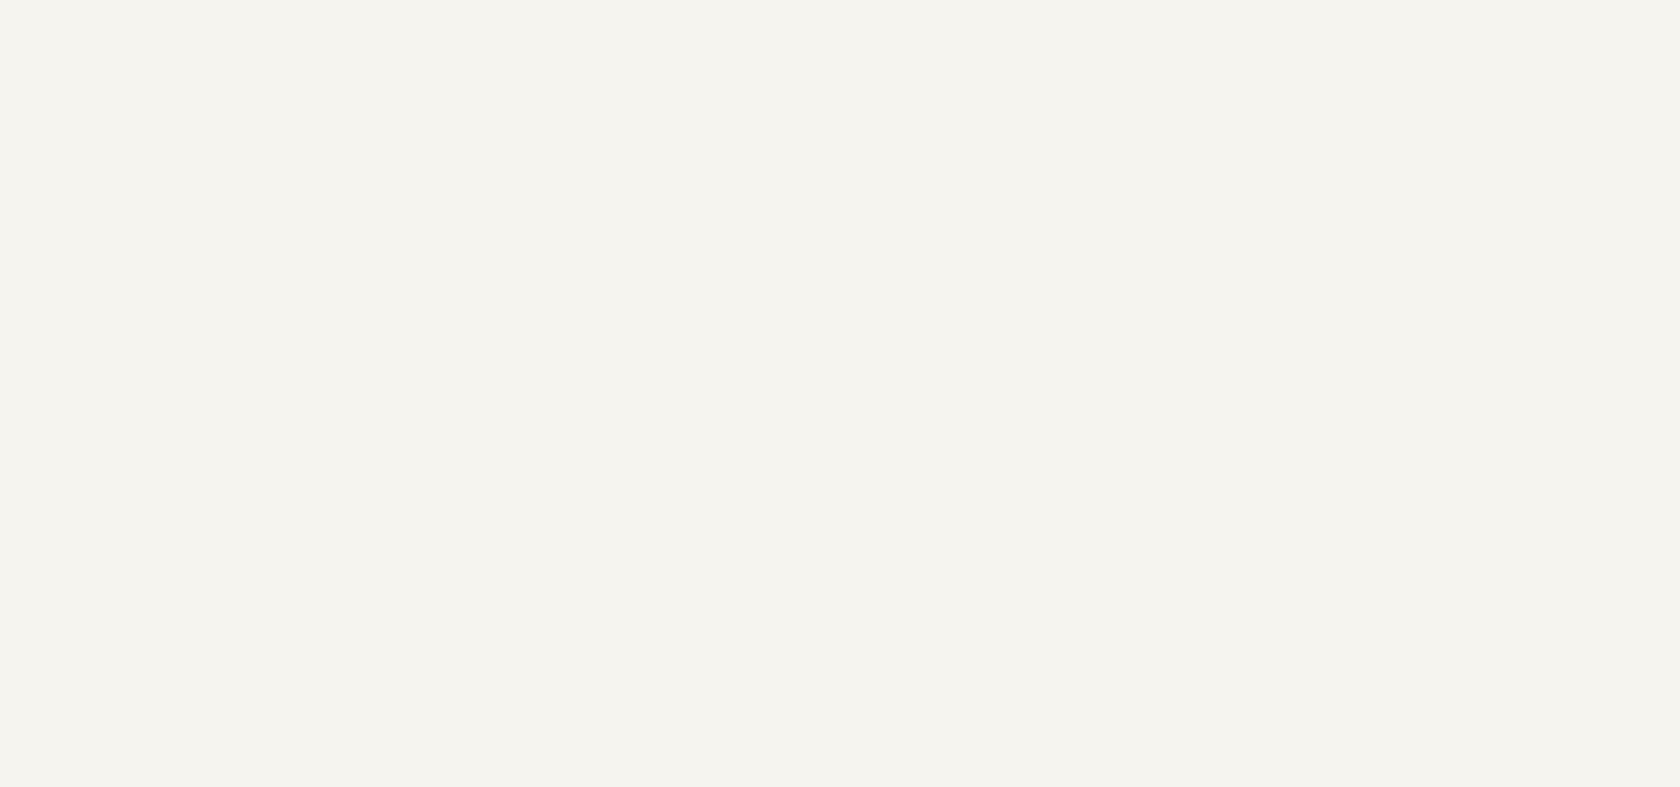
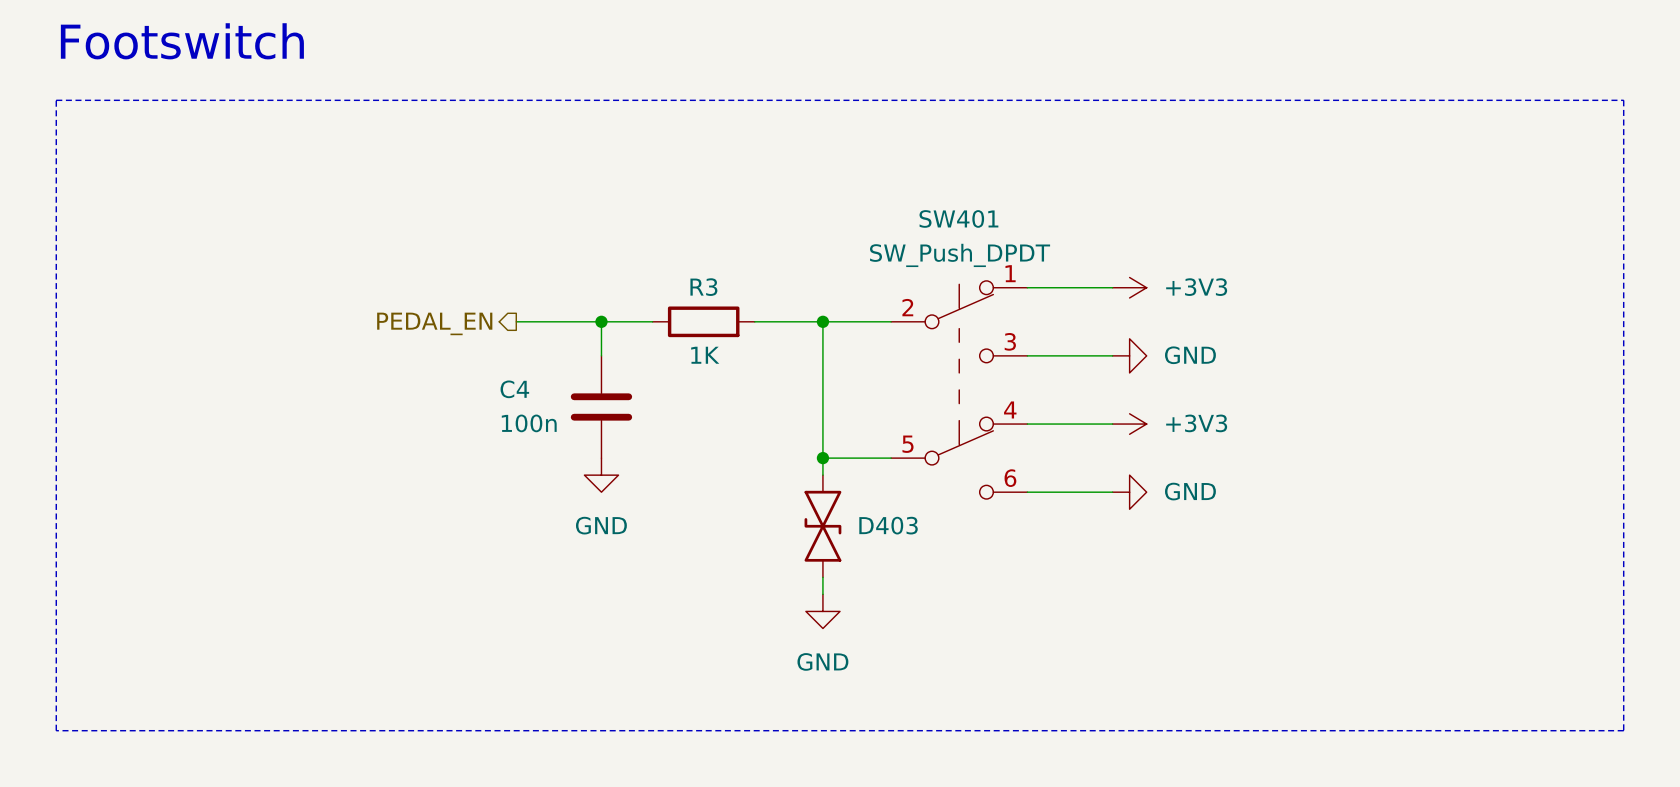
text: none -> Footswitch (182, 41)
line: none -> (56, 100) (1623, 100) (1623, 730) (56, 730) (56, 100)
wire: none -> (1027, 287) (1112, 287)
power symbol: none -> +3V3 (1129, 287)
wire: none -> (516, 321) (652, 321)
wire: none -> (601, 321) (601, 355)
junction: none -> (601, 321)
R3: none -> 1K (703, 321)
wire: none -> (754, 321) (891, 321)
wire: none -> (822, 321) (822, 475)
junction: none -> (822, 321)
hierarchical label: none -> PEDAL_EN (434, 323)
wire: none -> (1027, 355) (1112, 355)
power symbol: none -> GND (1129, 355)
SW401: none -> SW_Push_DPDT (959, 389)
C4: none -> 100n (601, 406)
wire: none -> (1027, 424) (1112, 424)
power symbol: none -> +3V3 (1129, 424)
wire: none -> (822, 458) (891, 458)
junction: none -> (822, 458)
power symbol: none -> GND (601, 475)
wire: none -> (1027, 492) (1112, 492)
power symbol: none -> GND (1129, 492)
D403: none -> (822, 526)
wire: none -> (822, 577) (822, 594)
power symbol: none -> GND (822, 611)

